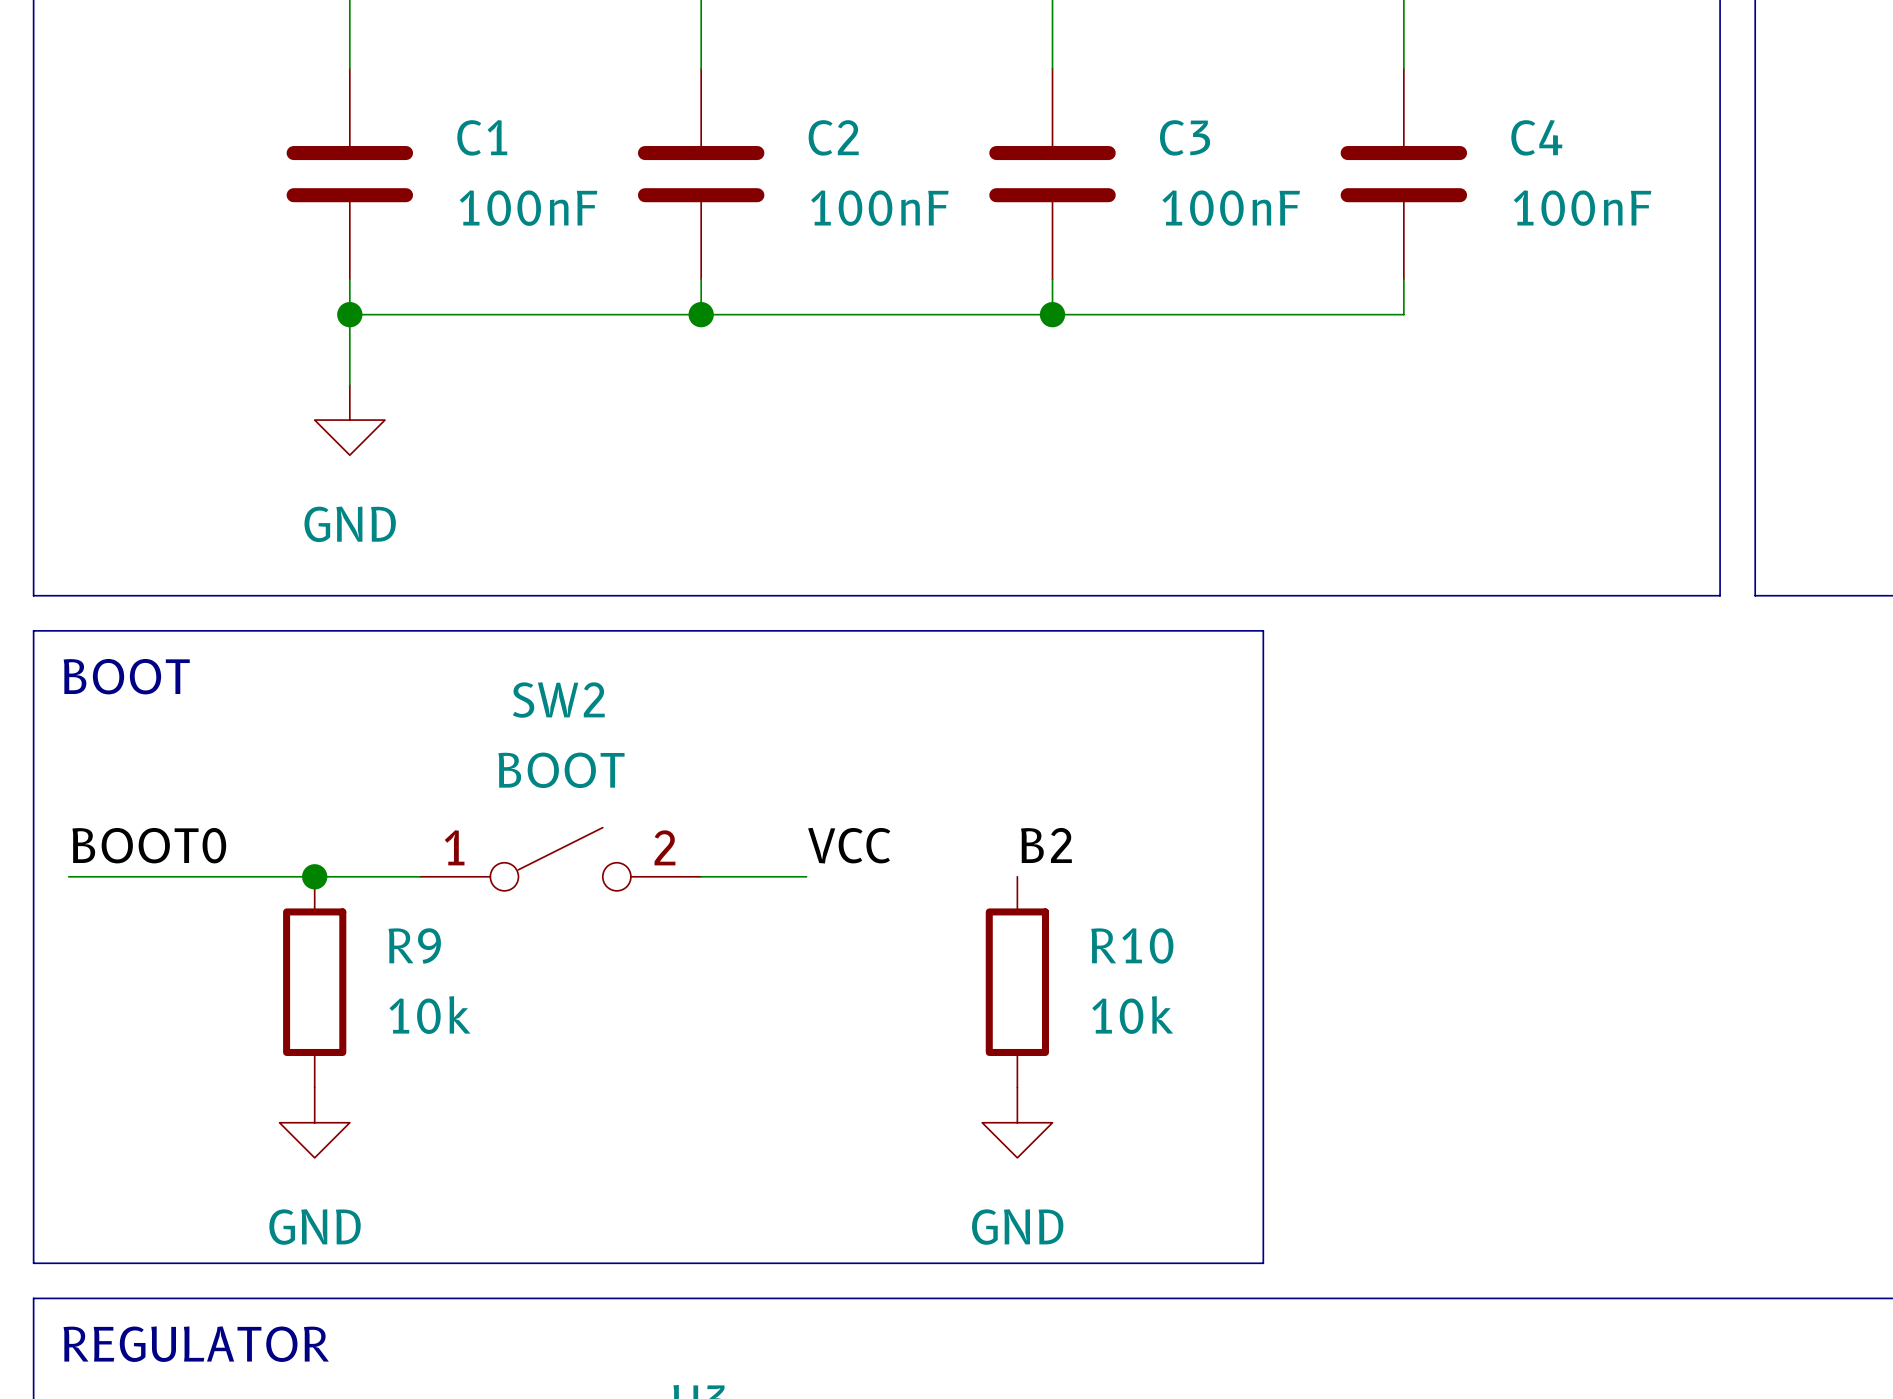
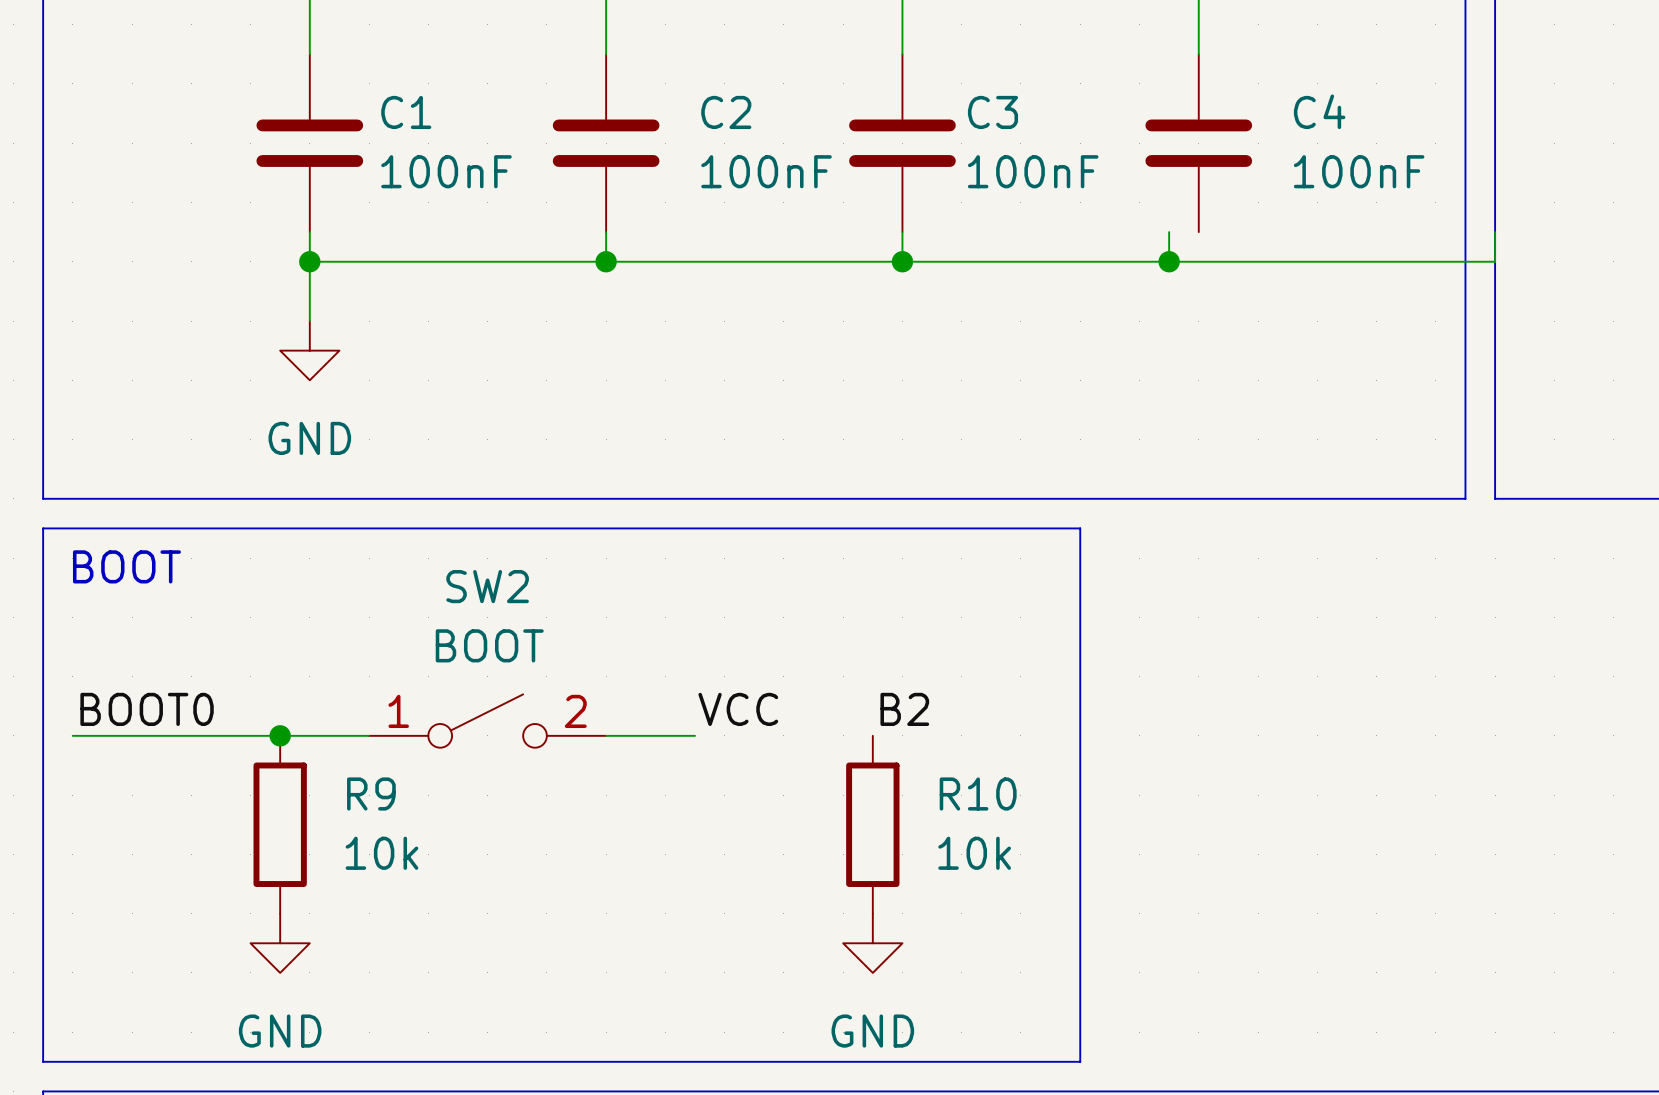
C1 name position: C1 (482, 137) -> C1 (406, 112)
C3 name position: C3 (1185, 137) -> C3 (992, 112)
C1 value position: 100nF (528, 208) -> 100nF (446, 171)
C3 value position: 100nF (1231, 208) -> 100nF (1033, 171)
wire: none -> (1169, 232) (1169, 261)
wire: (1403, 279) (1403, 314) -> (1495, 232) (1495, 261) (1198, 261)
junction: none -> (1169, 261)

